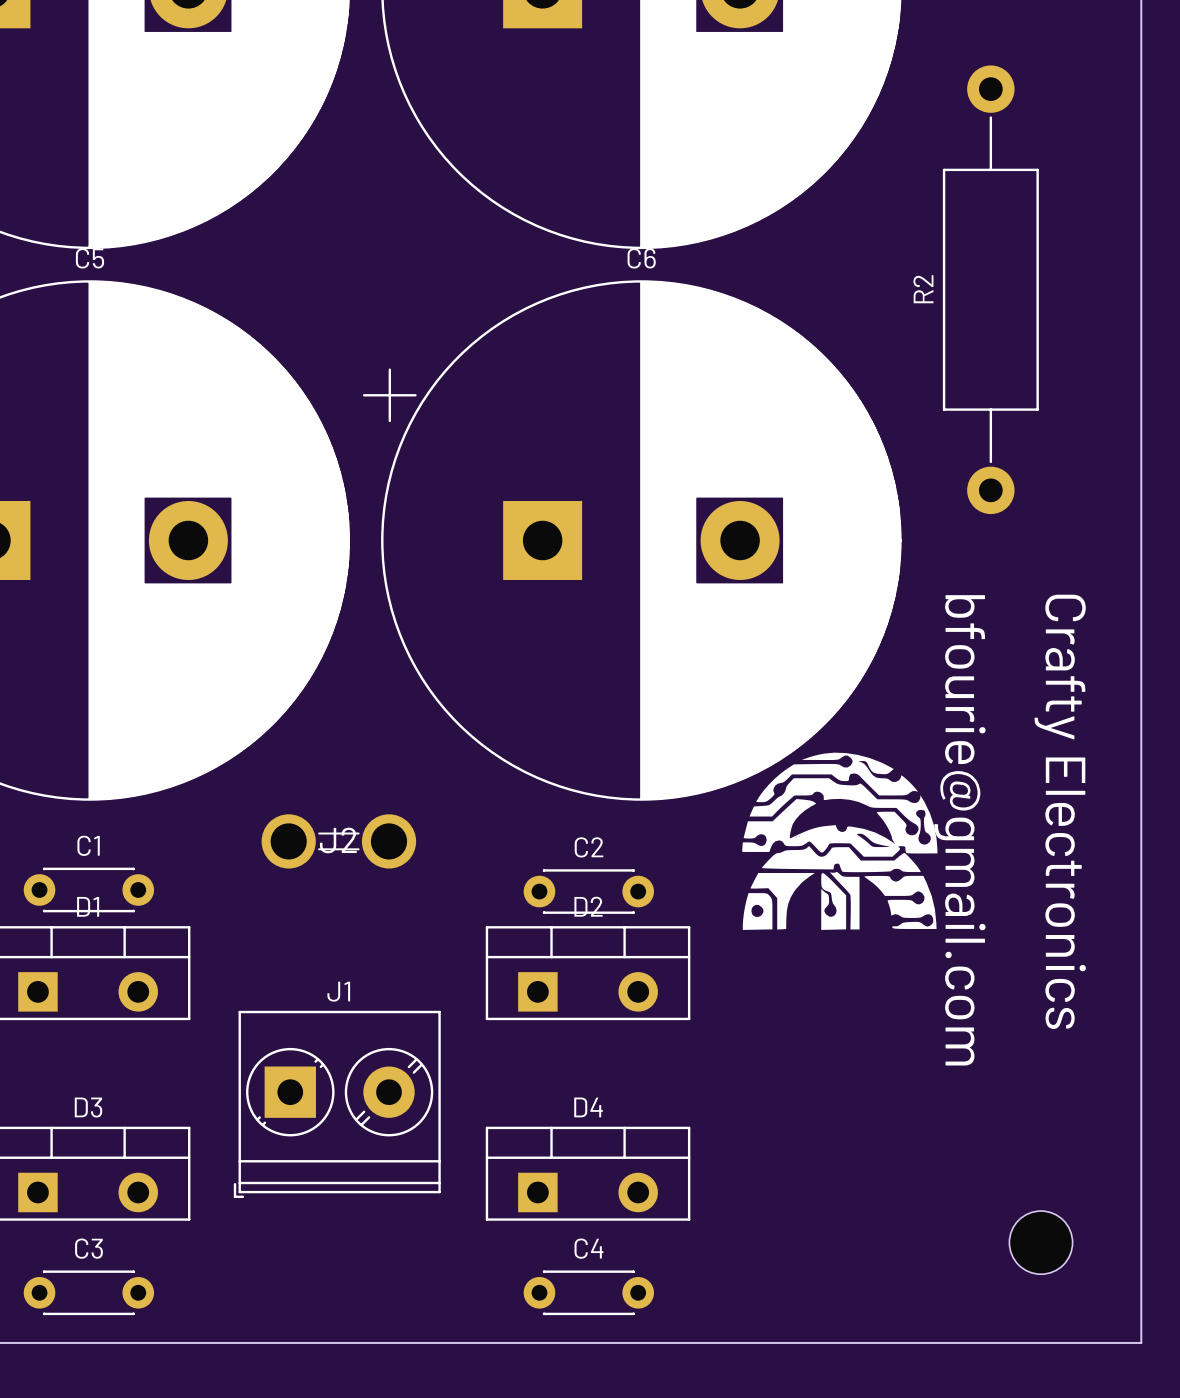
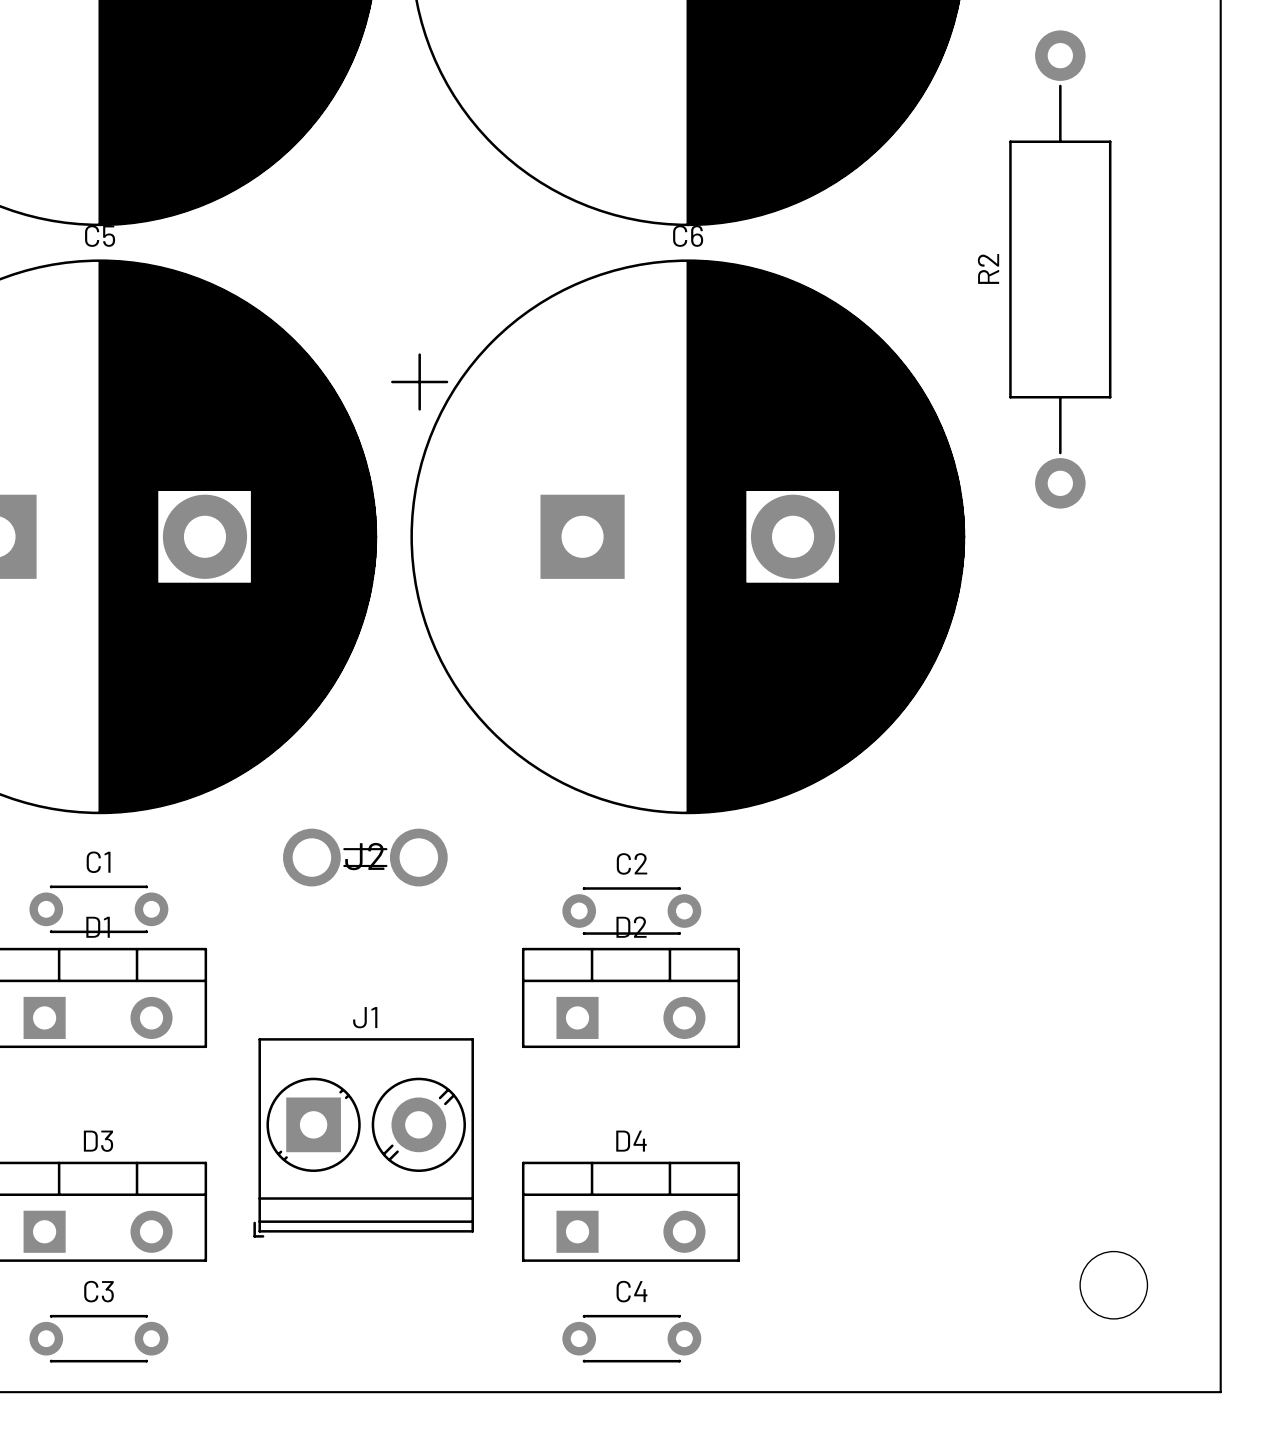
drawing: [742, 752, 938, 930] -> none
text: Crafty Electronics (1060, 811) -> none
text: bfourie@gmail.com (959, 830) -> none

